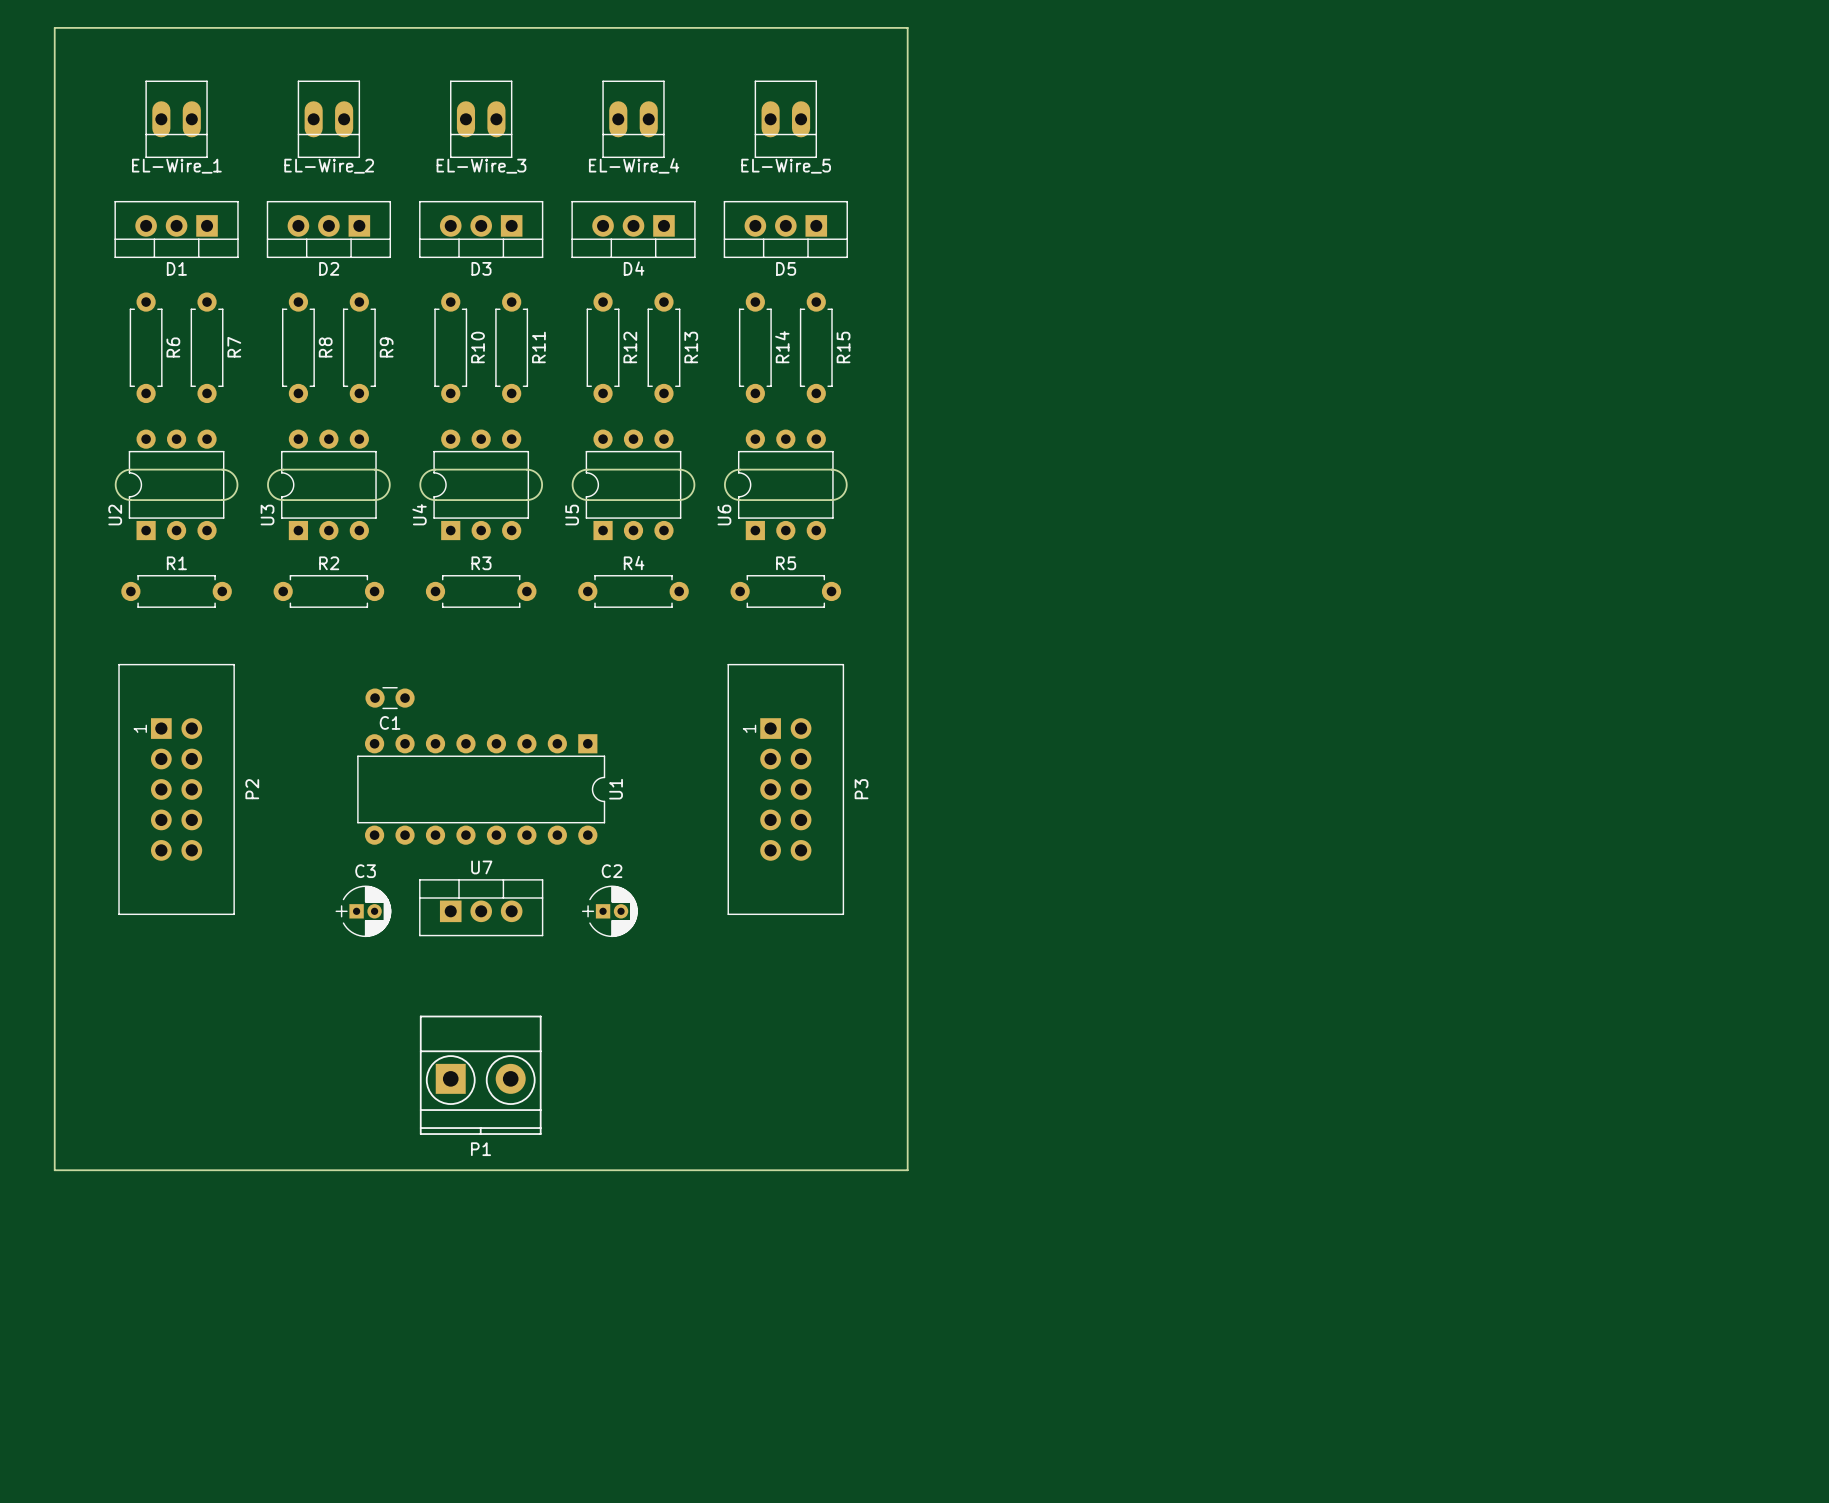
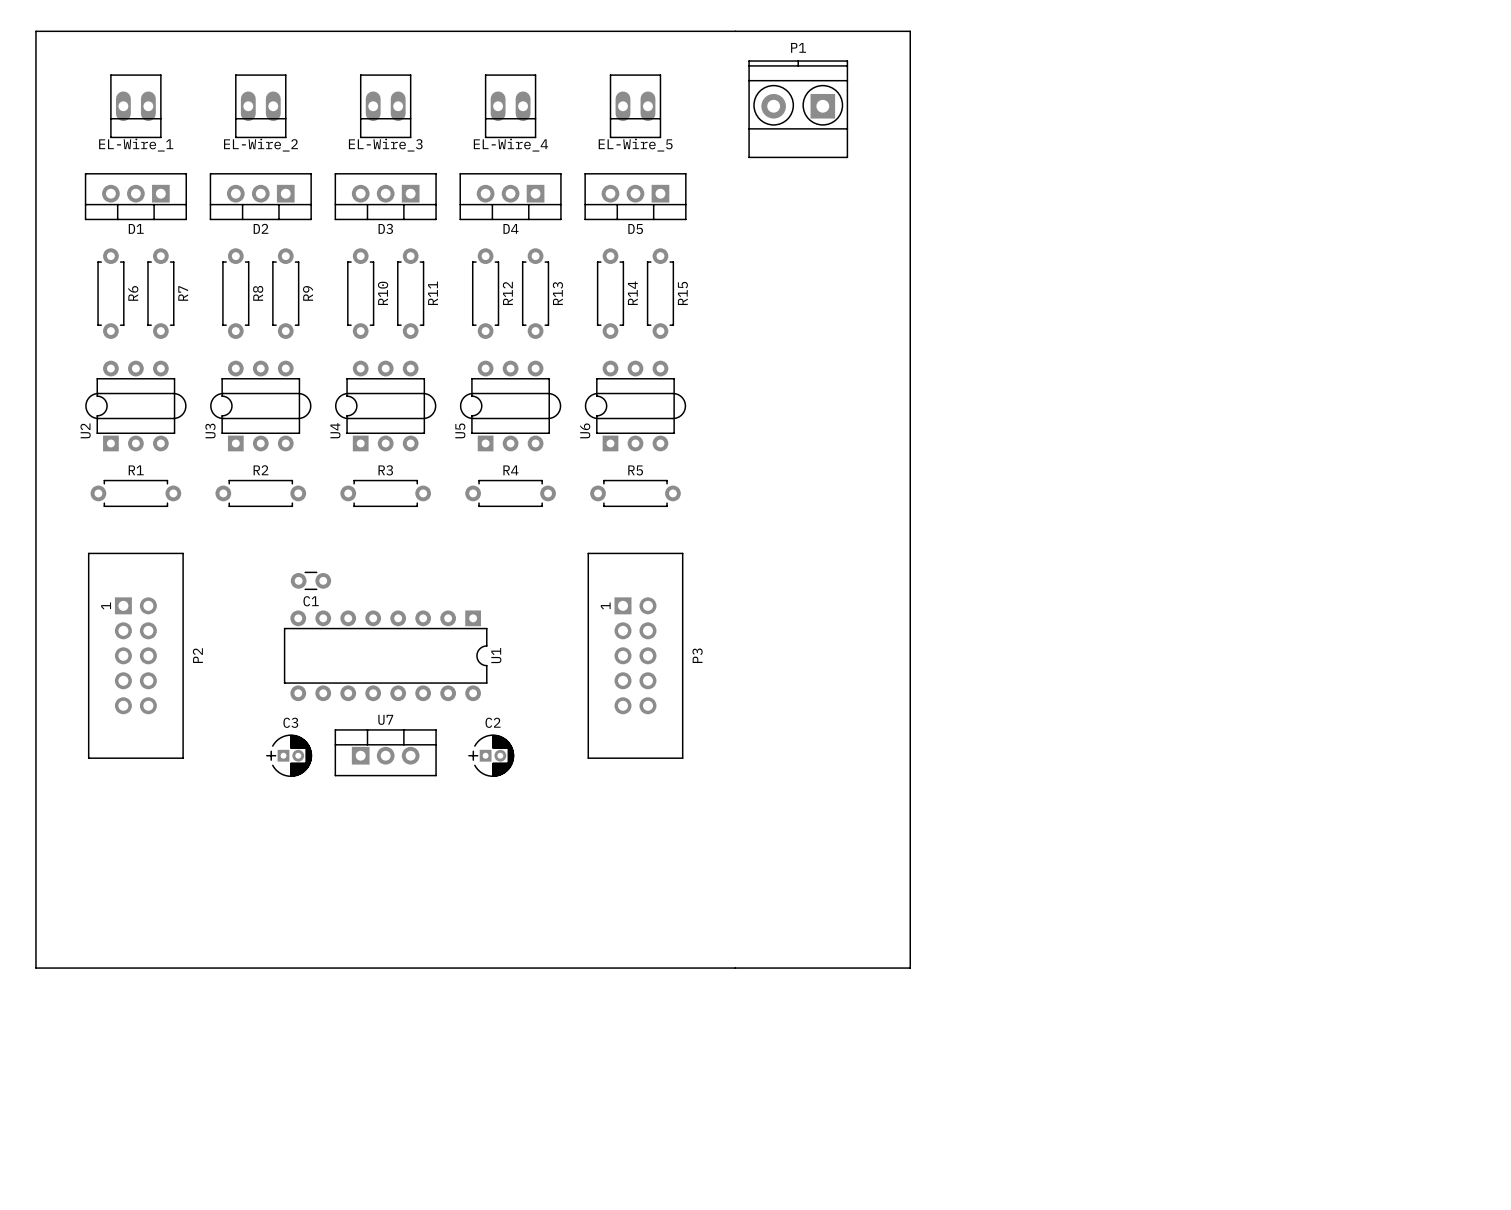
board edge: (907, 27) (907, 1170) -> (735, 31) (910, 31) (910, 968) (735, 968)
P1 rotation: 0° (480, 1075) -> 180° (798, 109)
P1 position: (480, 1075) -> (798, 109)

